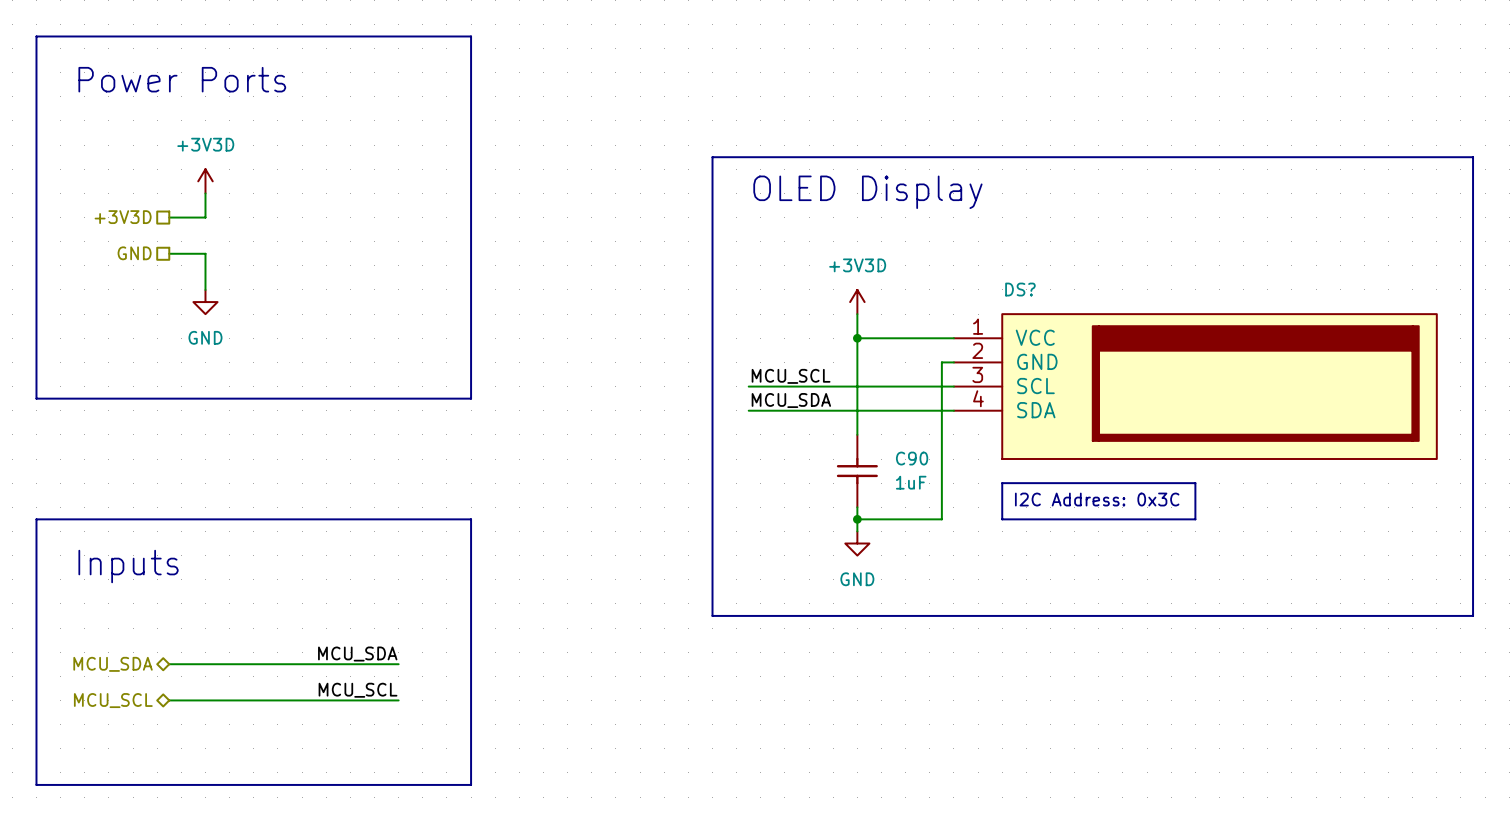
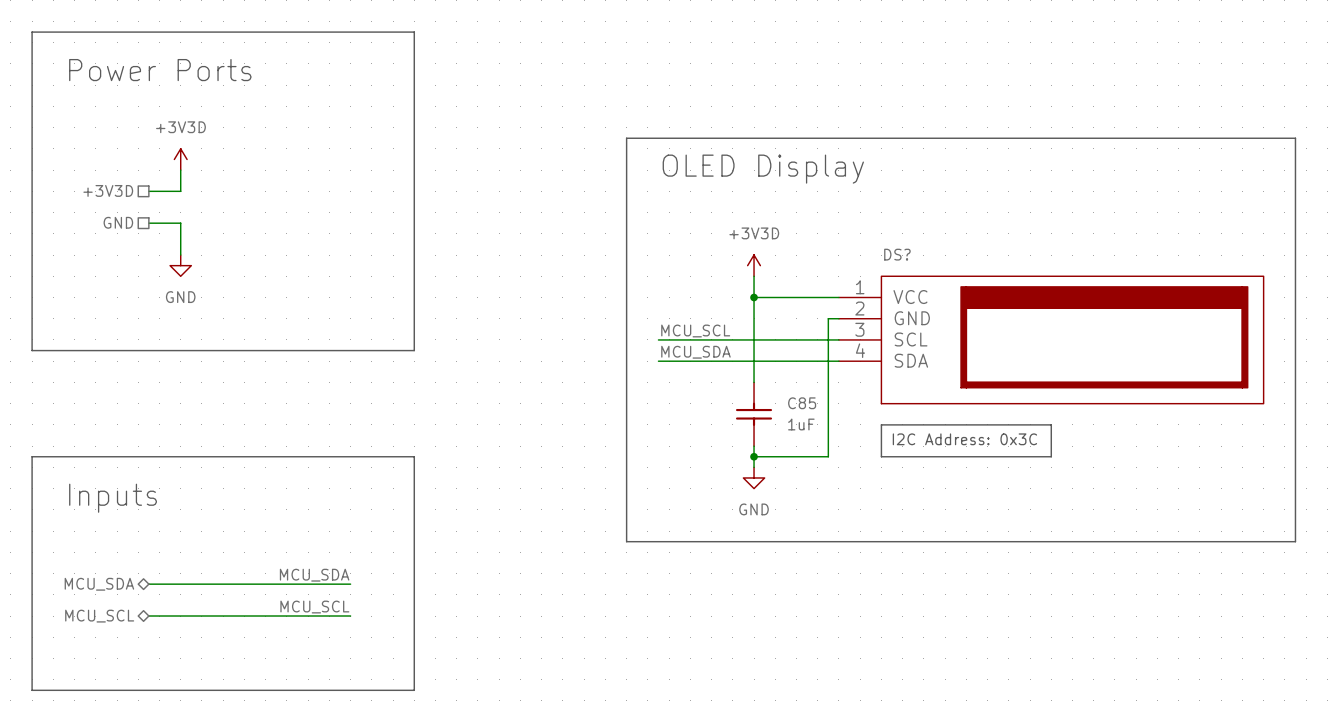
C90 name: C90 (912, 458) -> C85 (802, 403)

